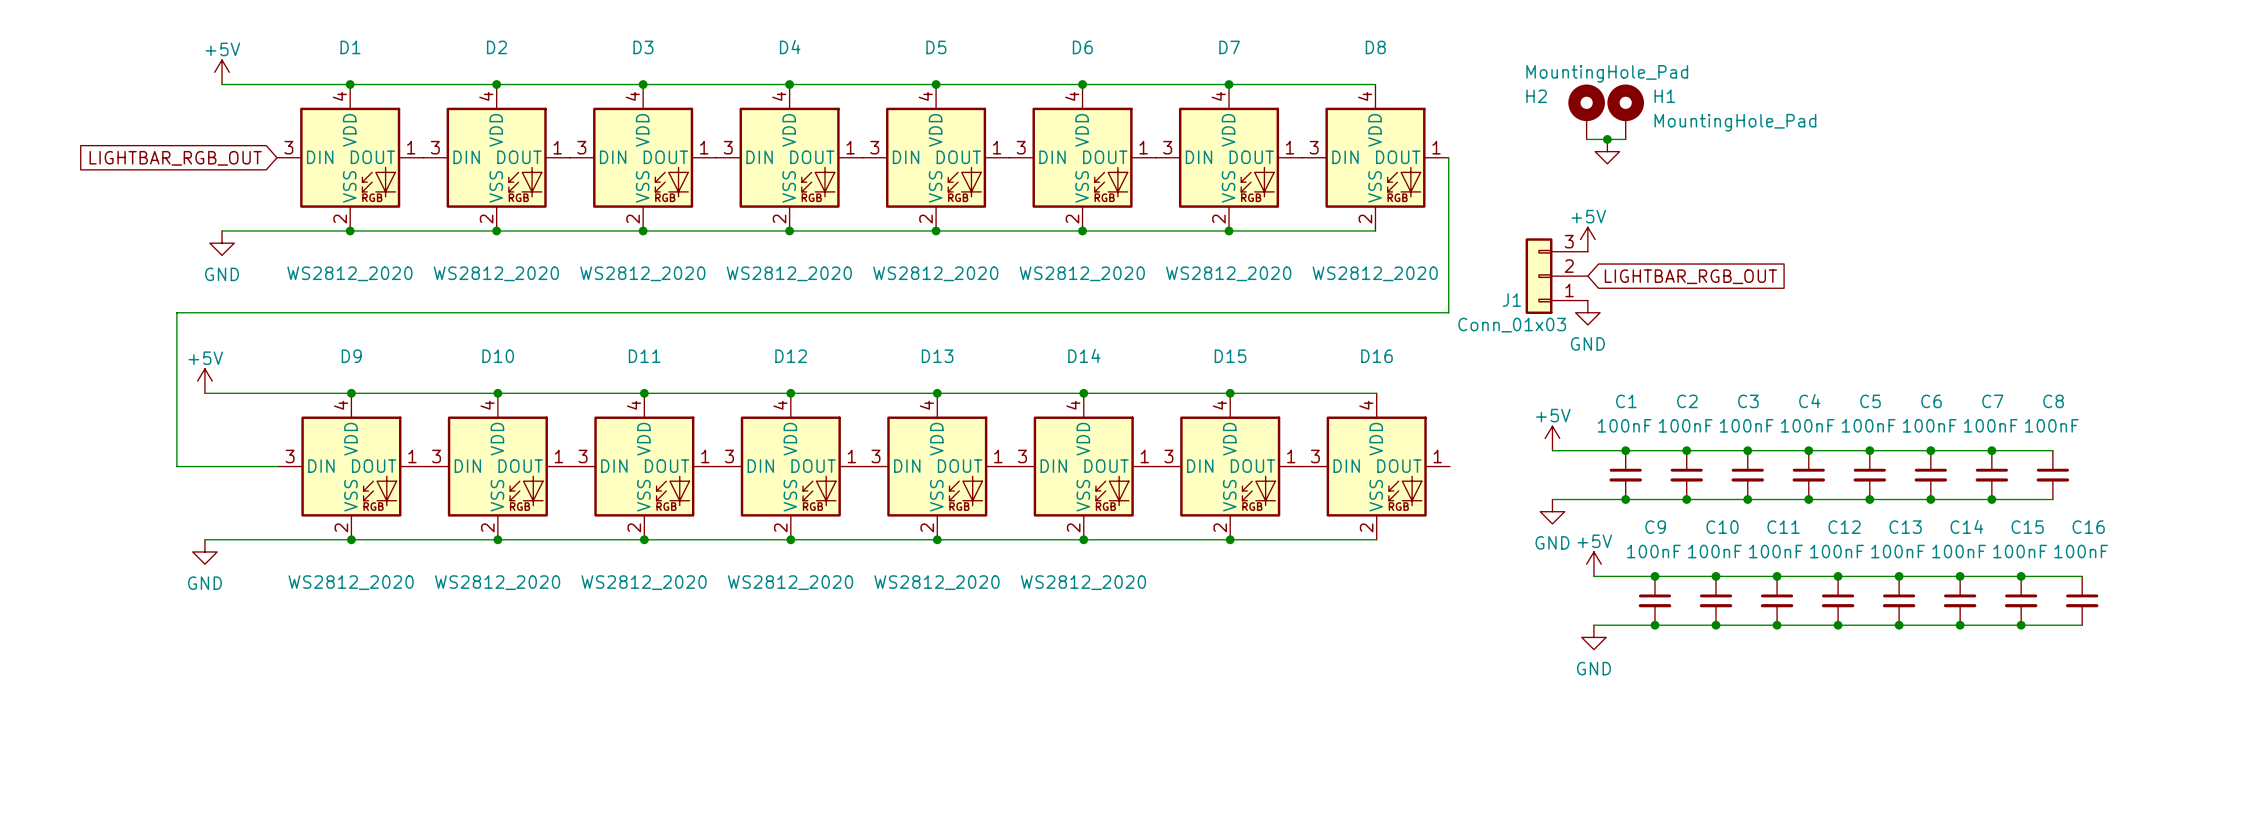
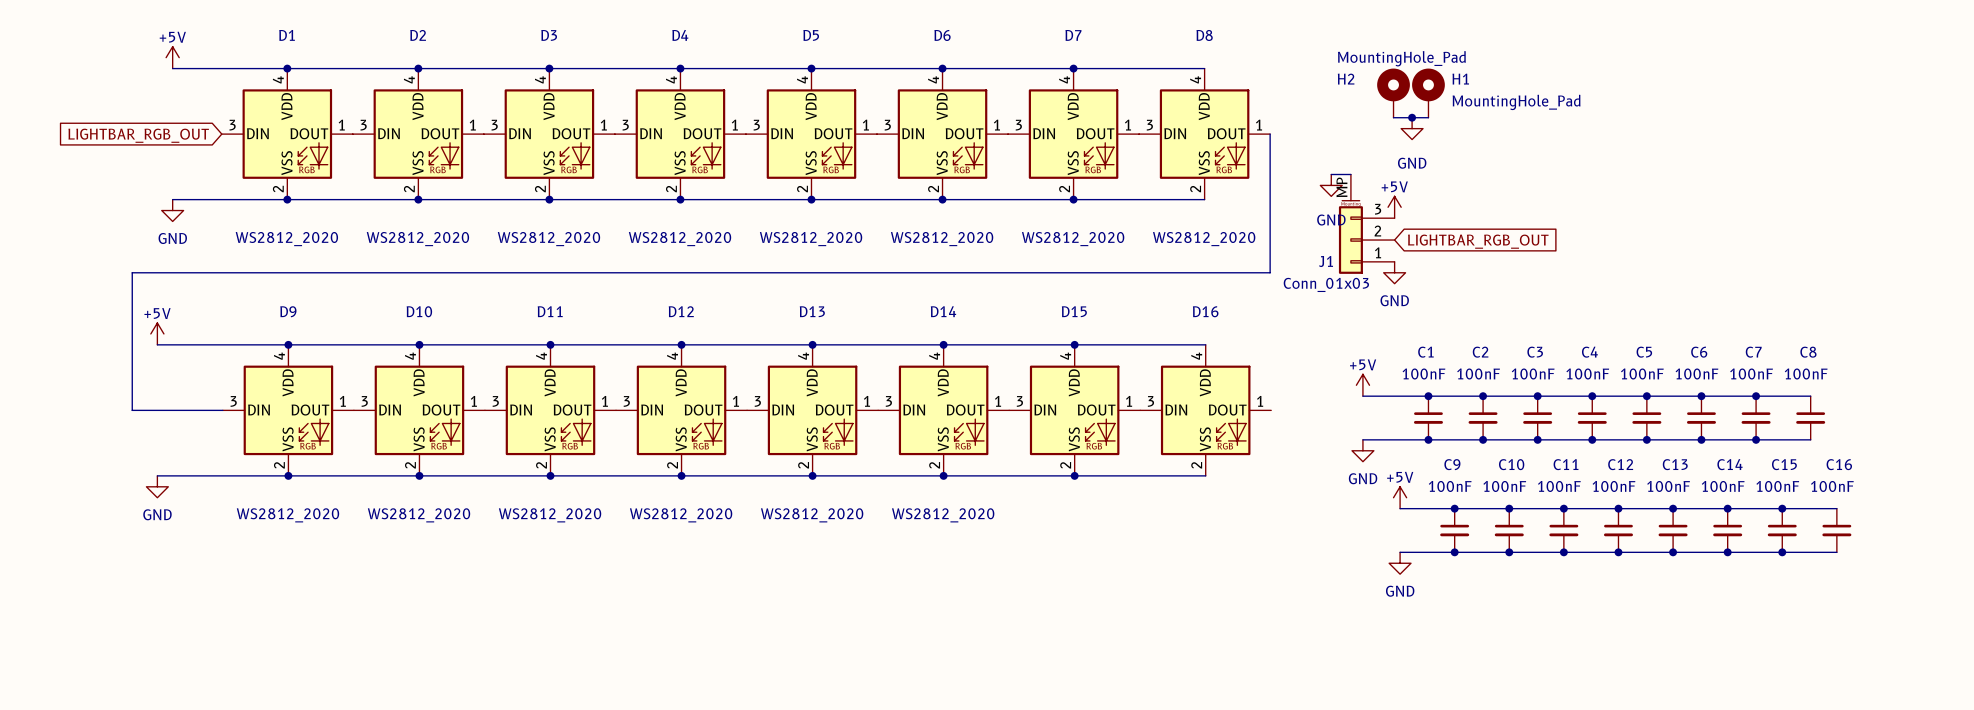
power symbol text: none -> GND (1412, 163)
wire: none -> (1331, 174) (1350, 174)
power symbol: none -> GND (1331, 185)
J1 symbol: [1525, 238, 1588, 314] -> [1338, 174, 1395, 274]

